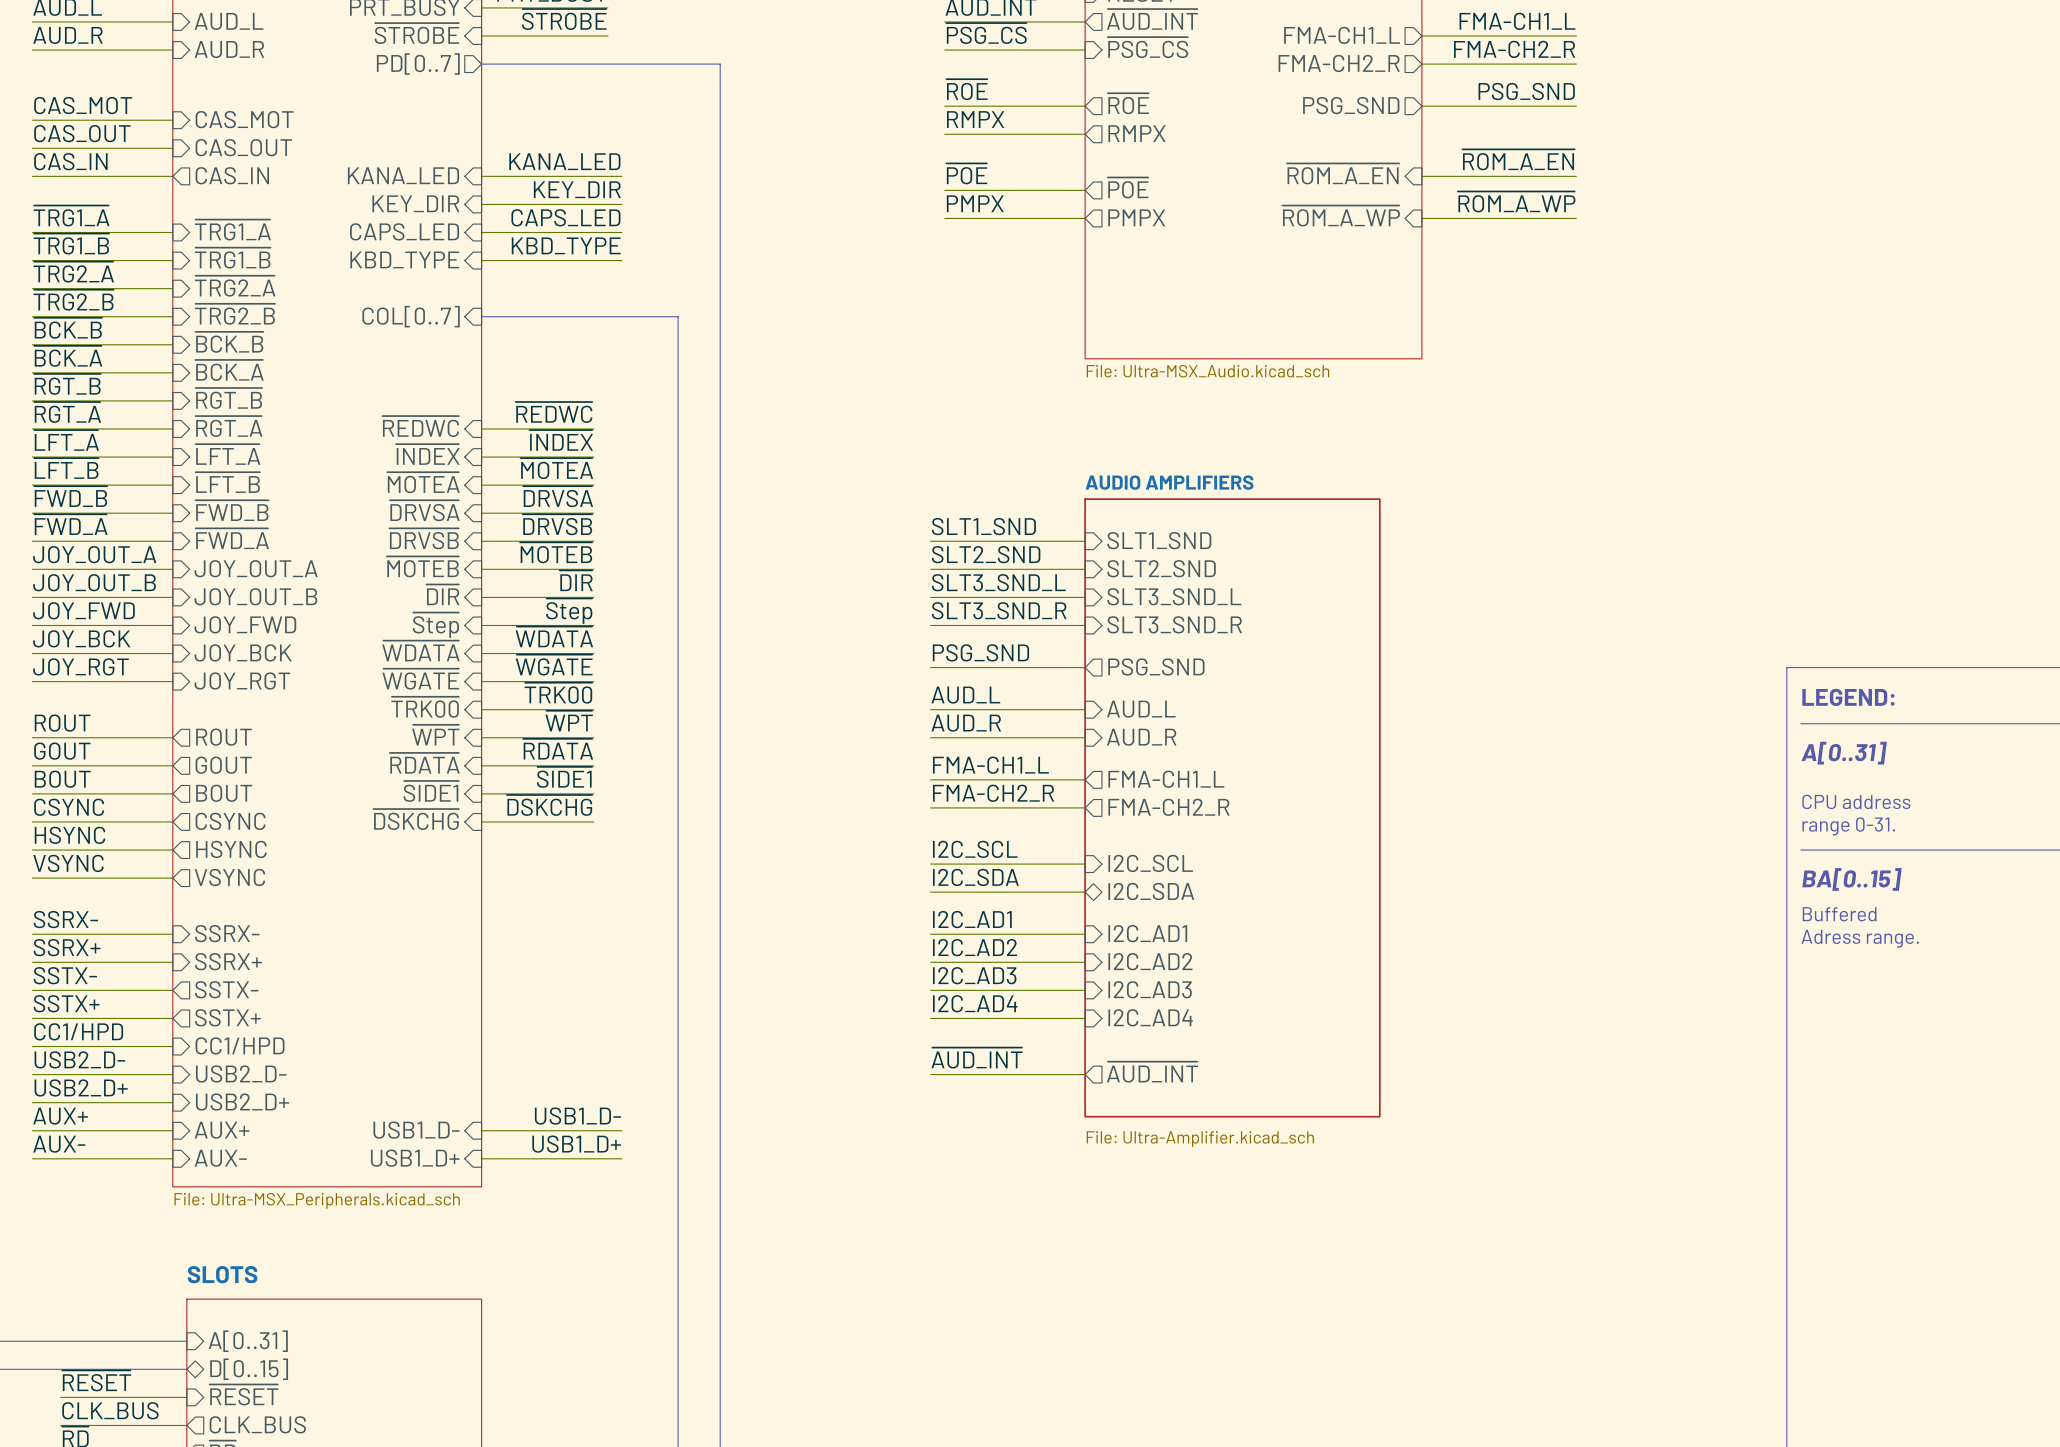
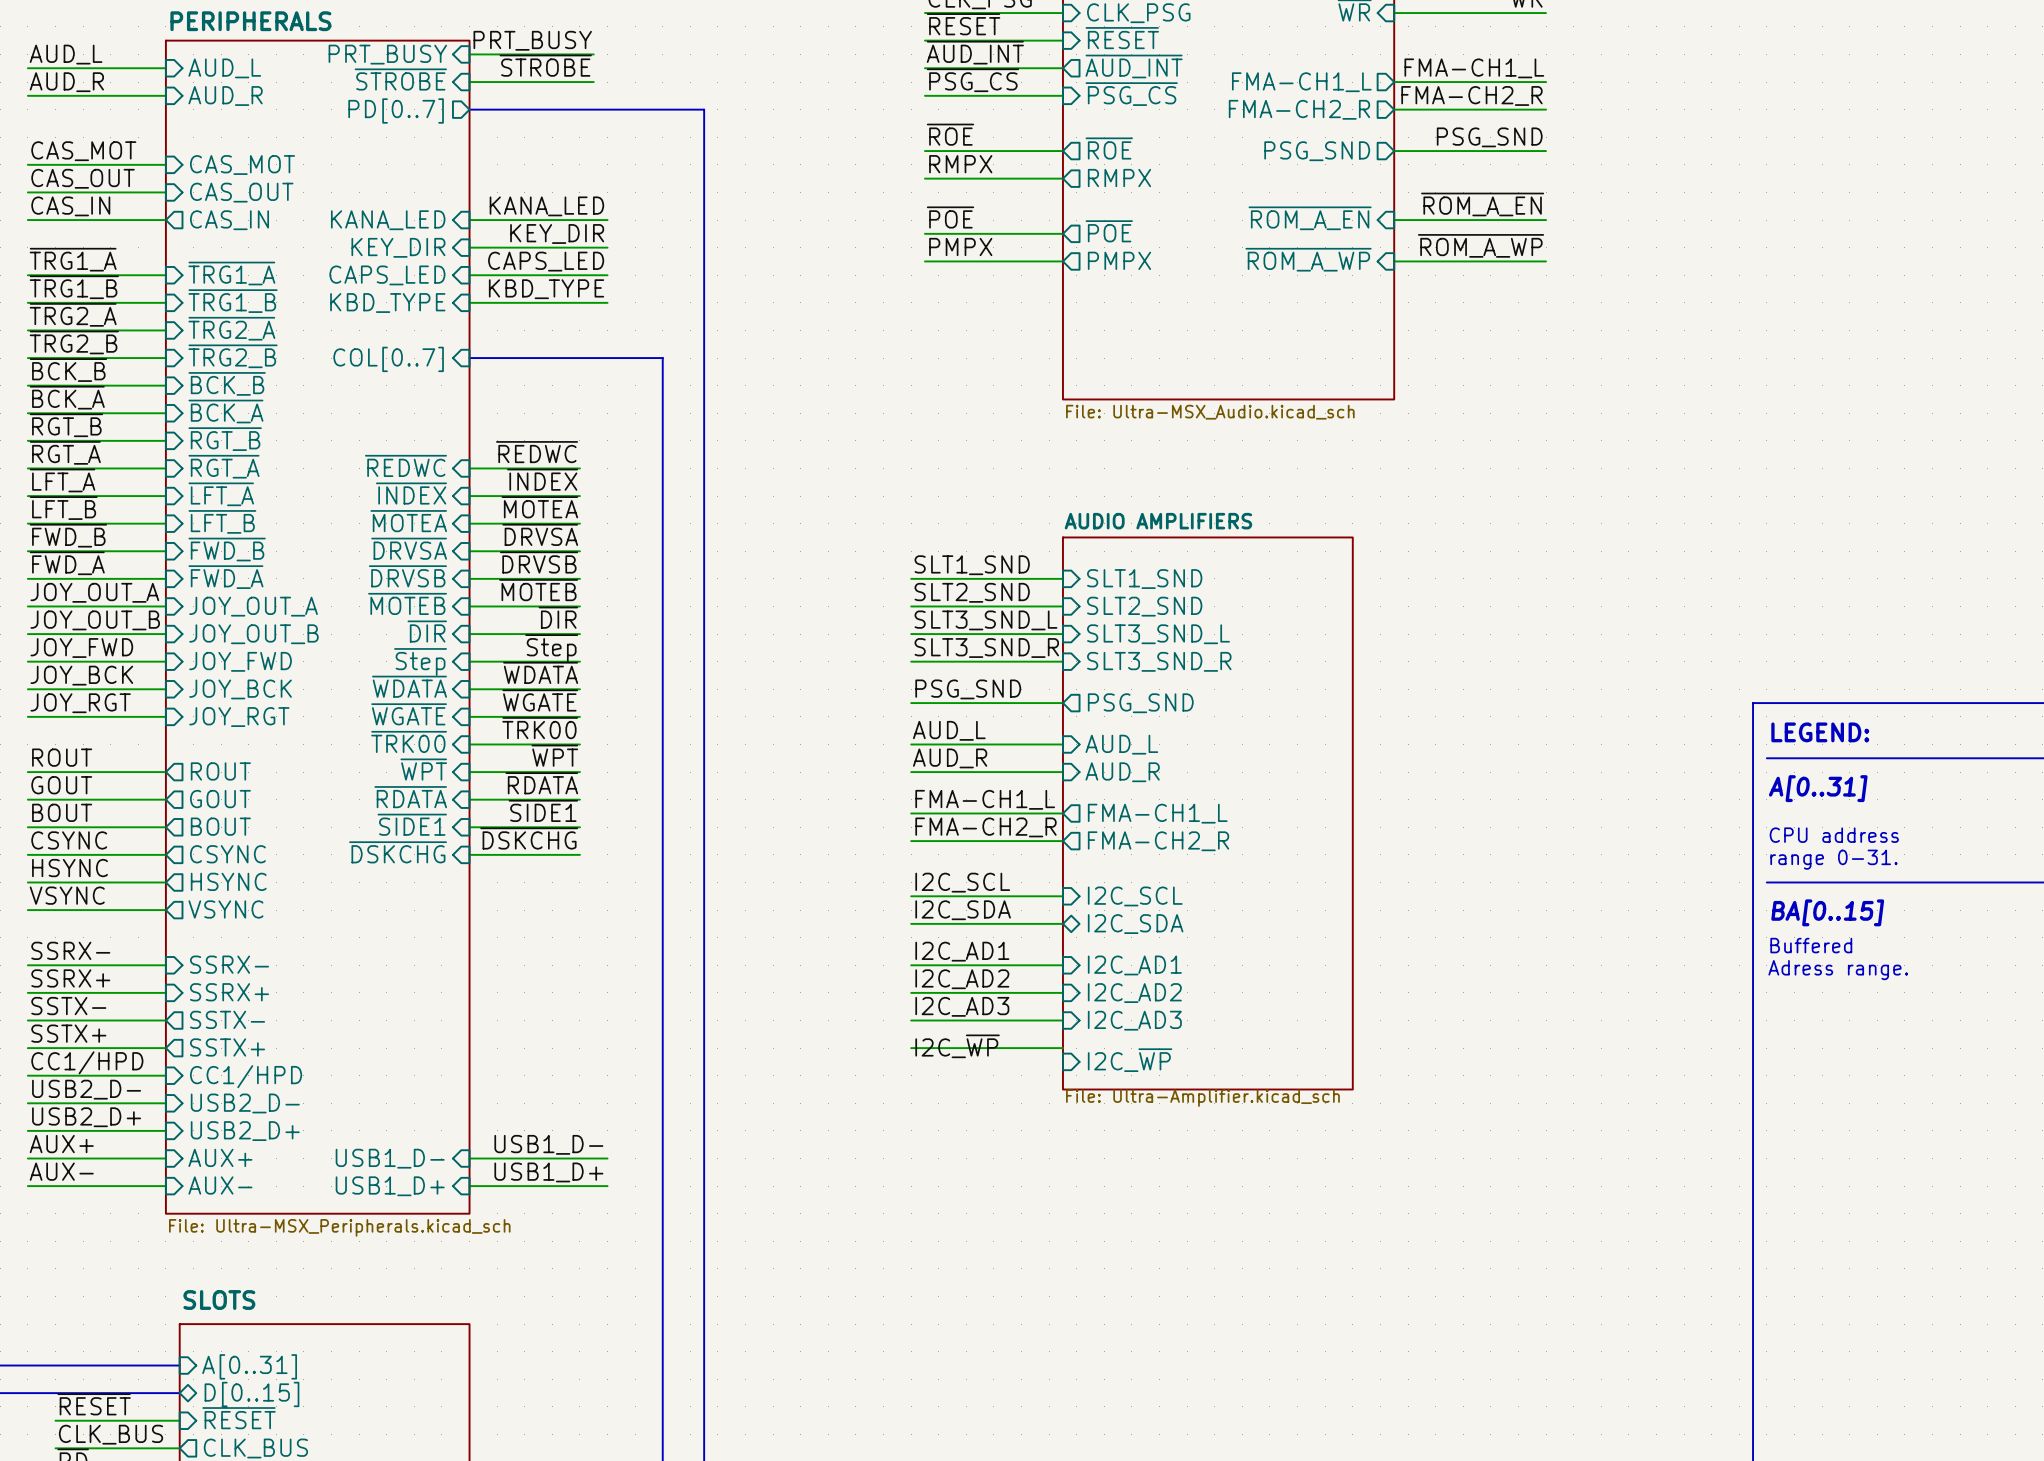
sheet AUDIO AMPLIFIERS: none -> File: Ultra-Amplifier.kicad_sch (1207, 813)
sheet AUDIO AMPLIFIERS: File: Ultra-Amplifier.kicad_sch (1232, 807) -> none
label: I2C_AD4 (975, 1003) -> none
label: none -> I2C_~{WP} (957, 1046)
sheet pin: I2C_AD4 (1150, 1017) -> none
sheet pin: none -> I2C_~{WP} (1130, 1060)
label: ~{AUD_INT} (977, 1058) -> none
sheet pin: ~{AUD_INT} (1152, 1072) -> none
wire: (930, 1074) (1085, 1074) -> none

